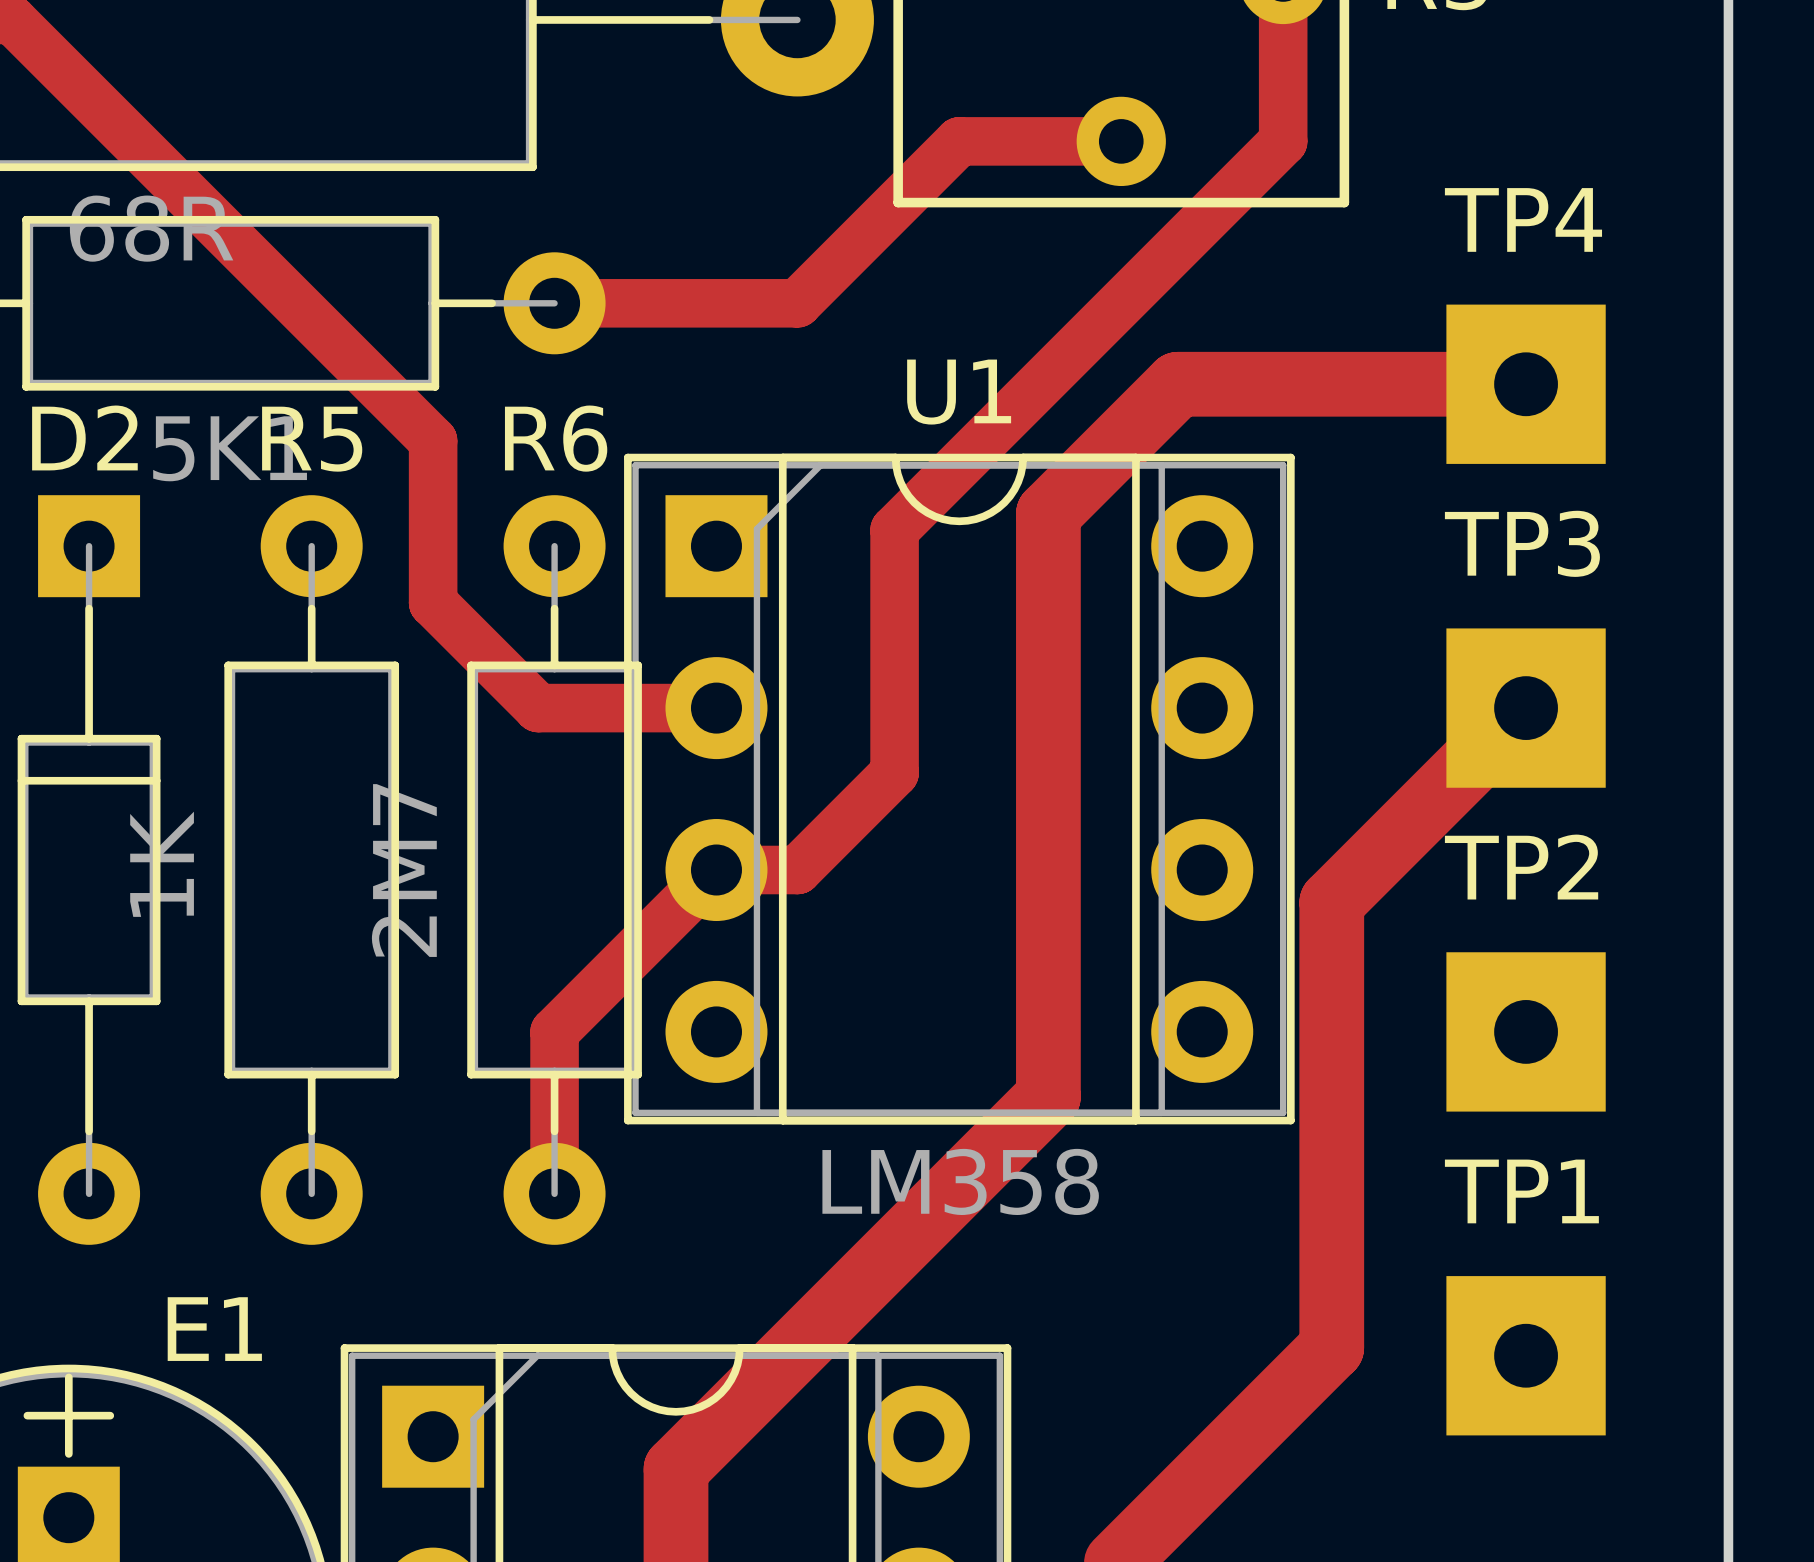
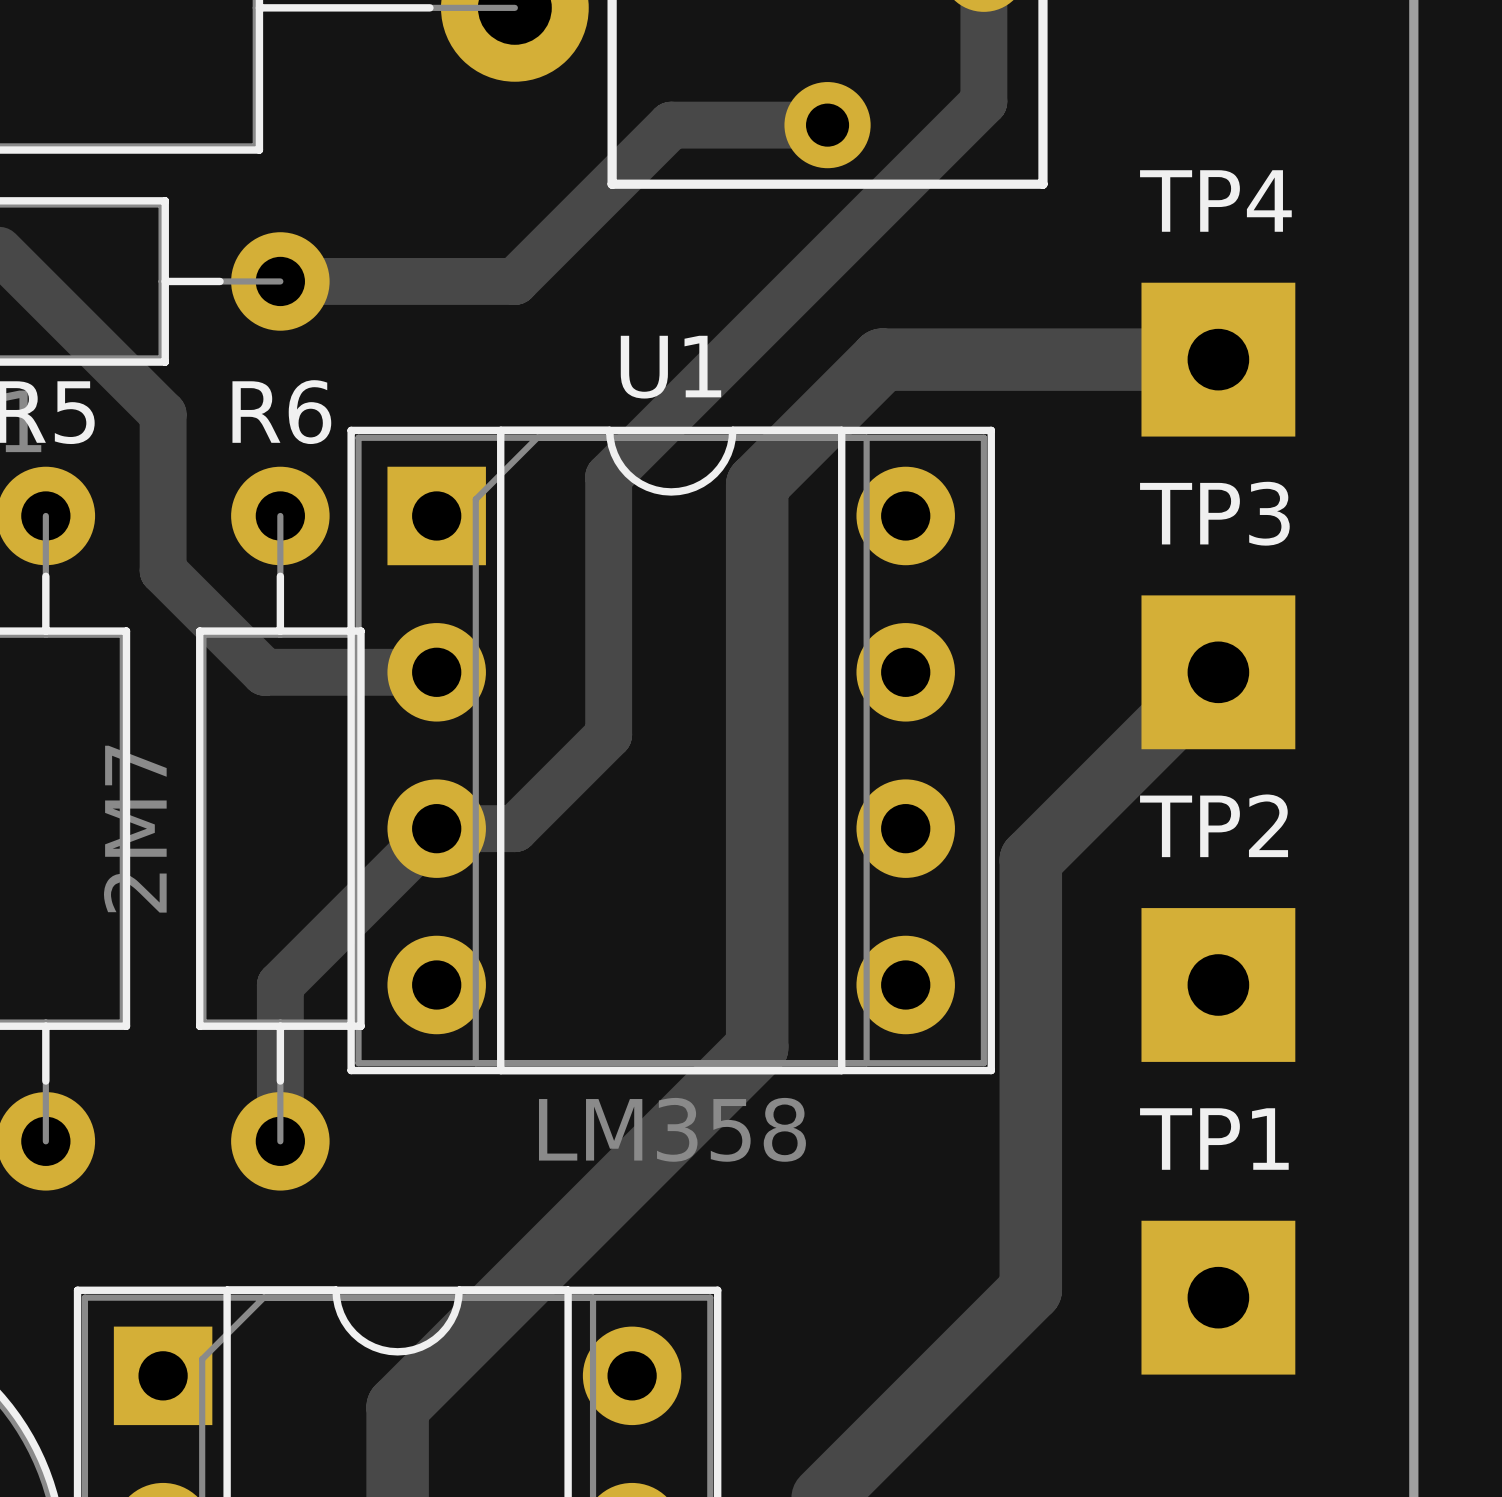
track: (1283, 117) (1283, 141) (894, 529) -> (983, 101) (608, 476) (608, 500)

